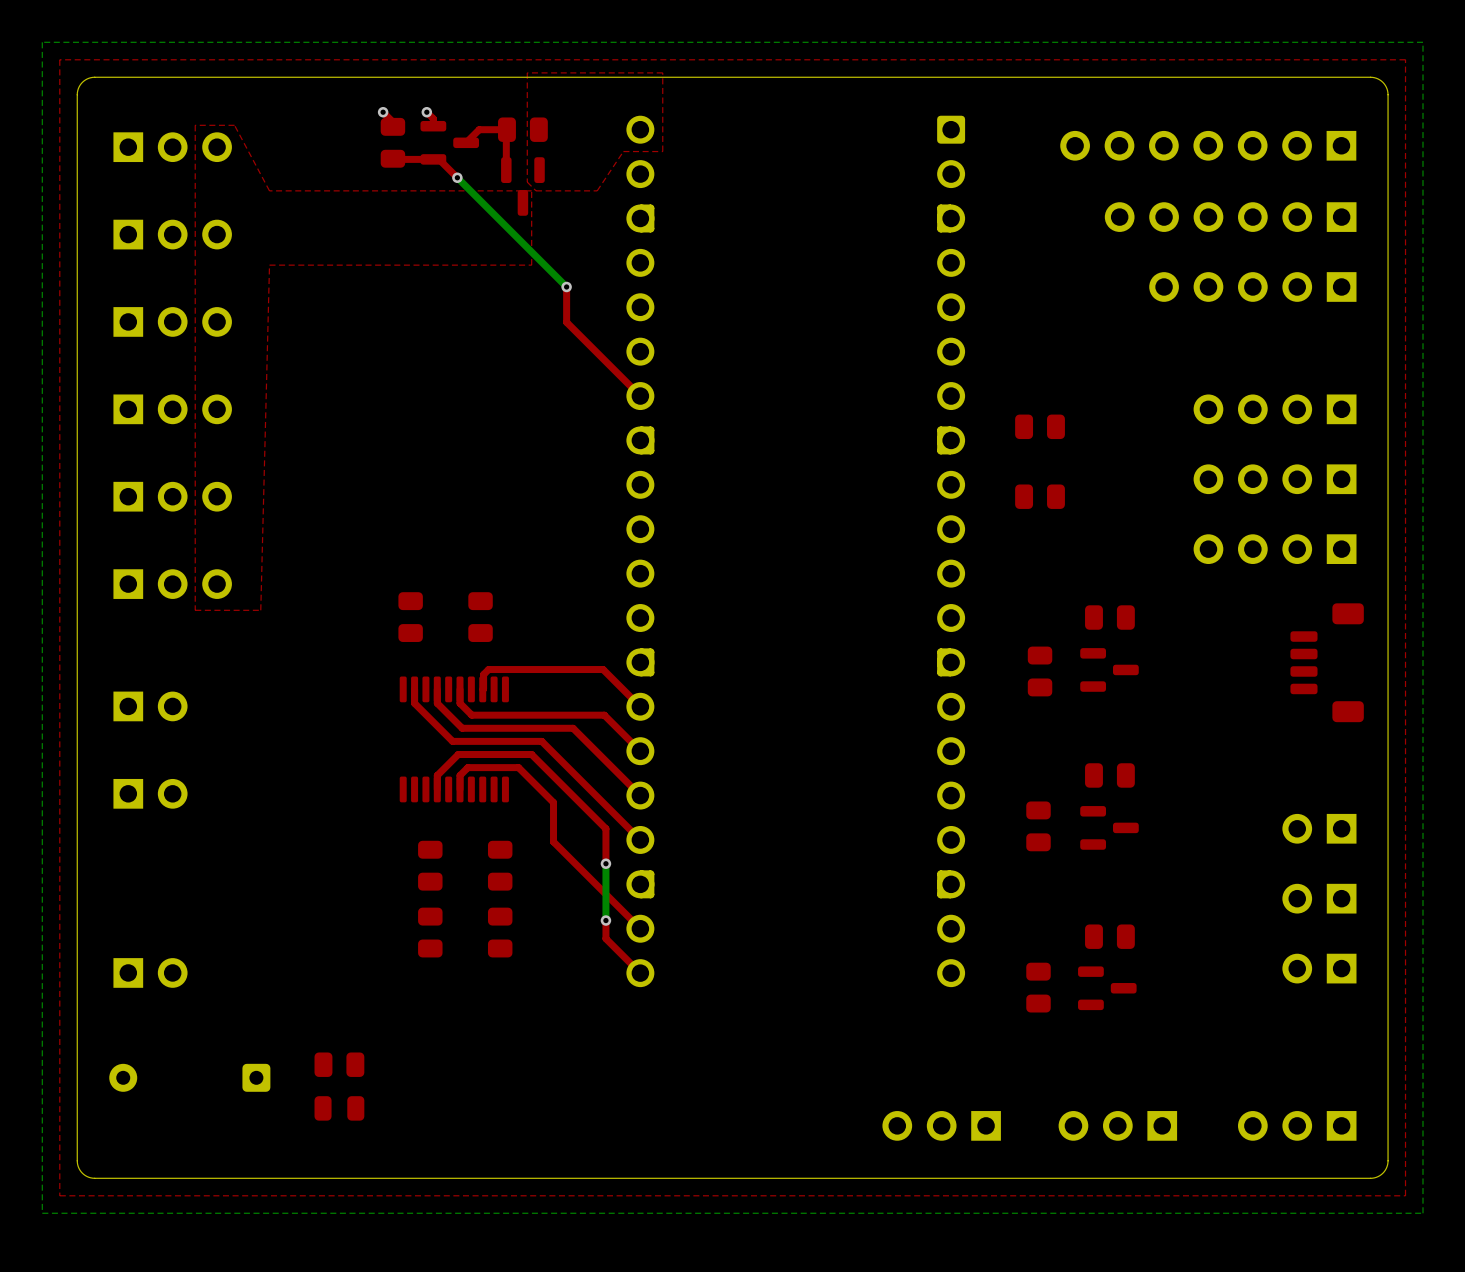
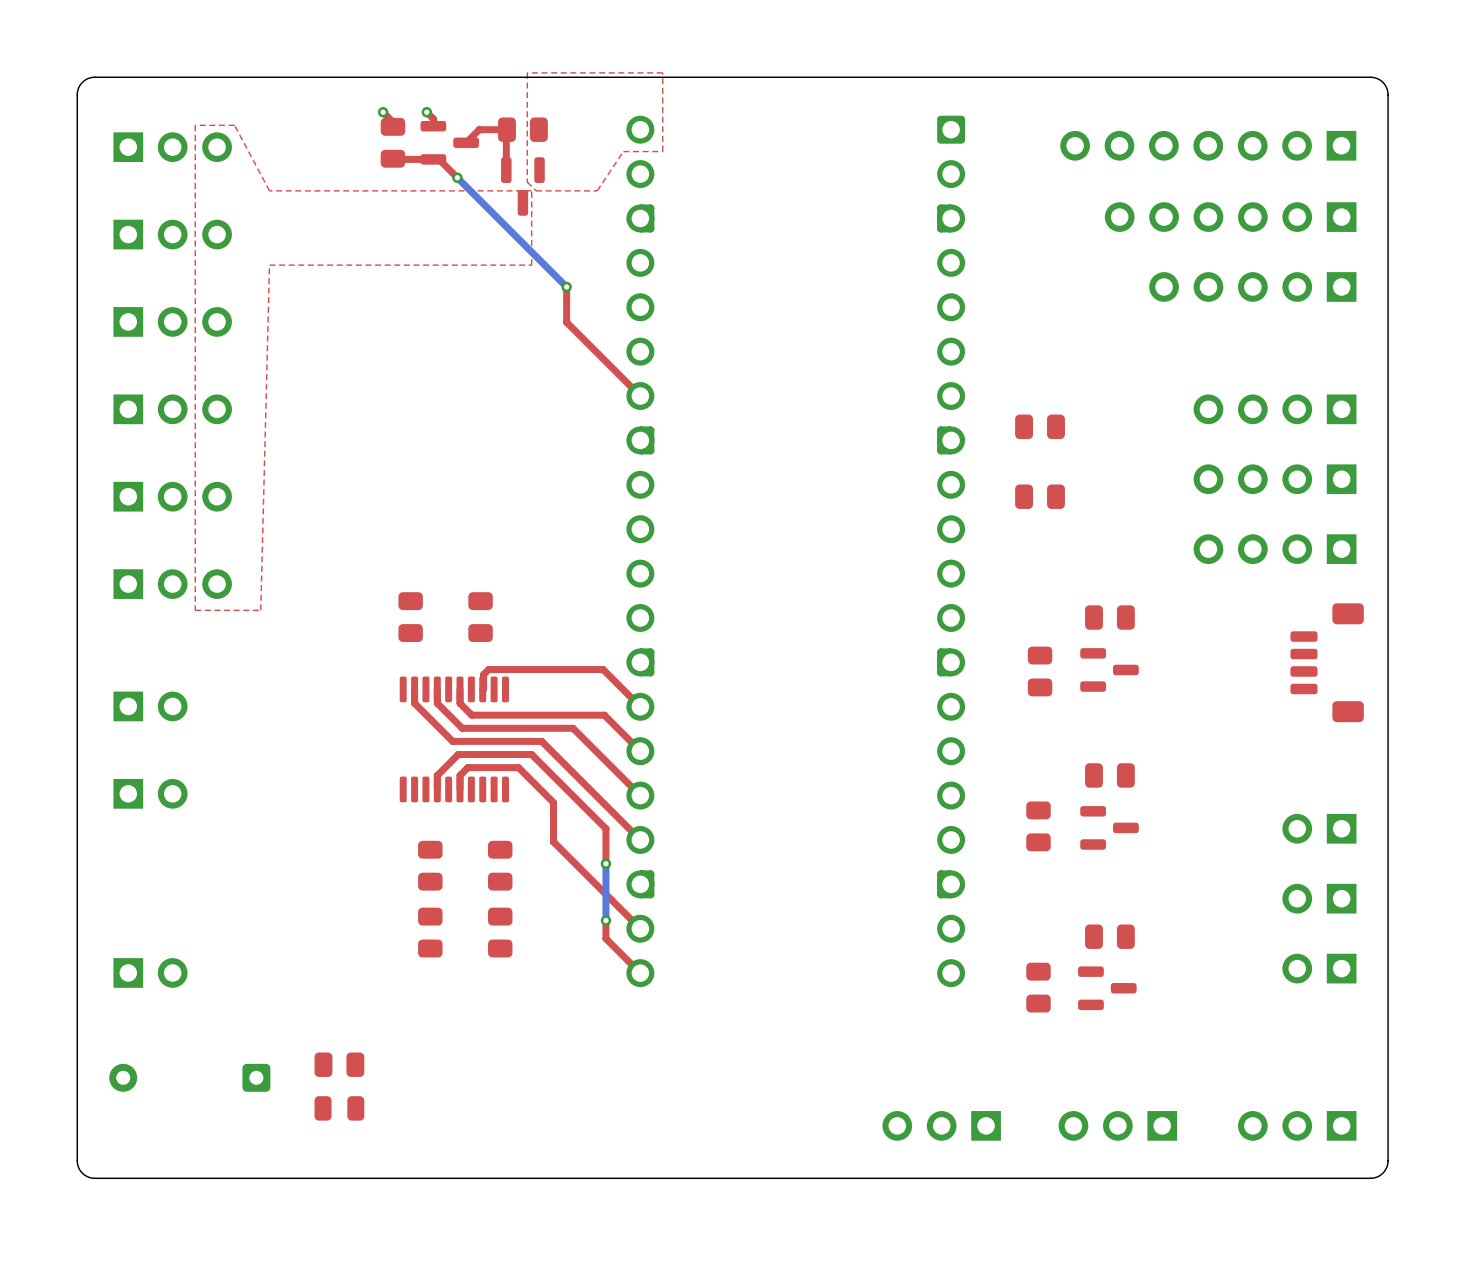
bottom zone outline: (1422, 42) (1422, 1213) (42, 1213) (42, 42) (1422, 42) -> none
top zone outline: (1405, 59) (59, 59) (59, 1195) (1405, 1195) (1405, 59) -> none

